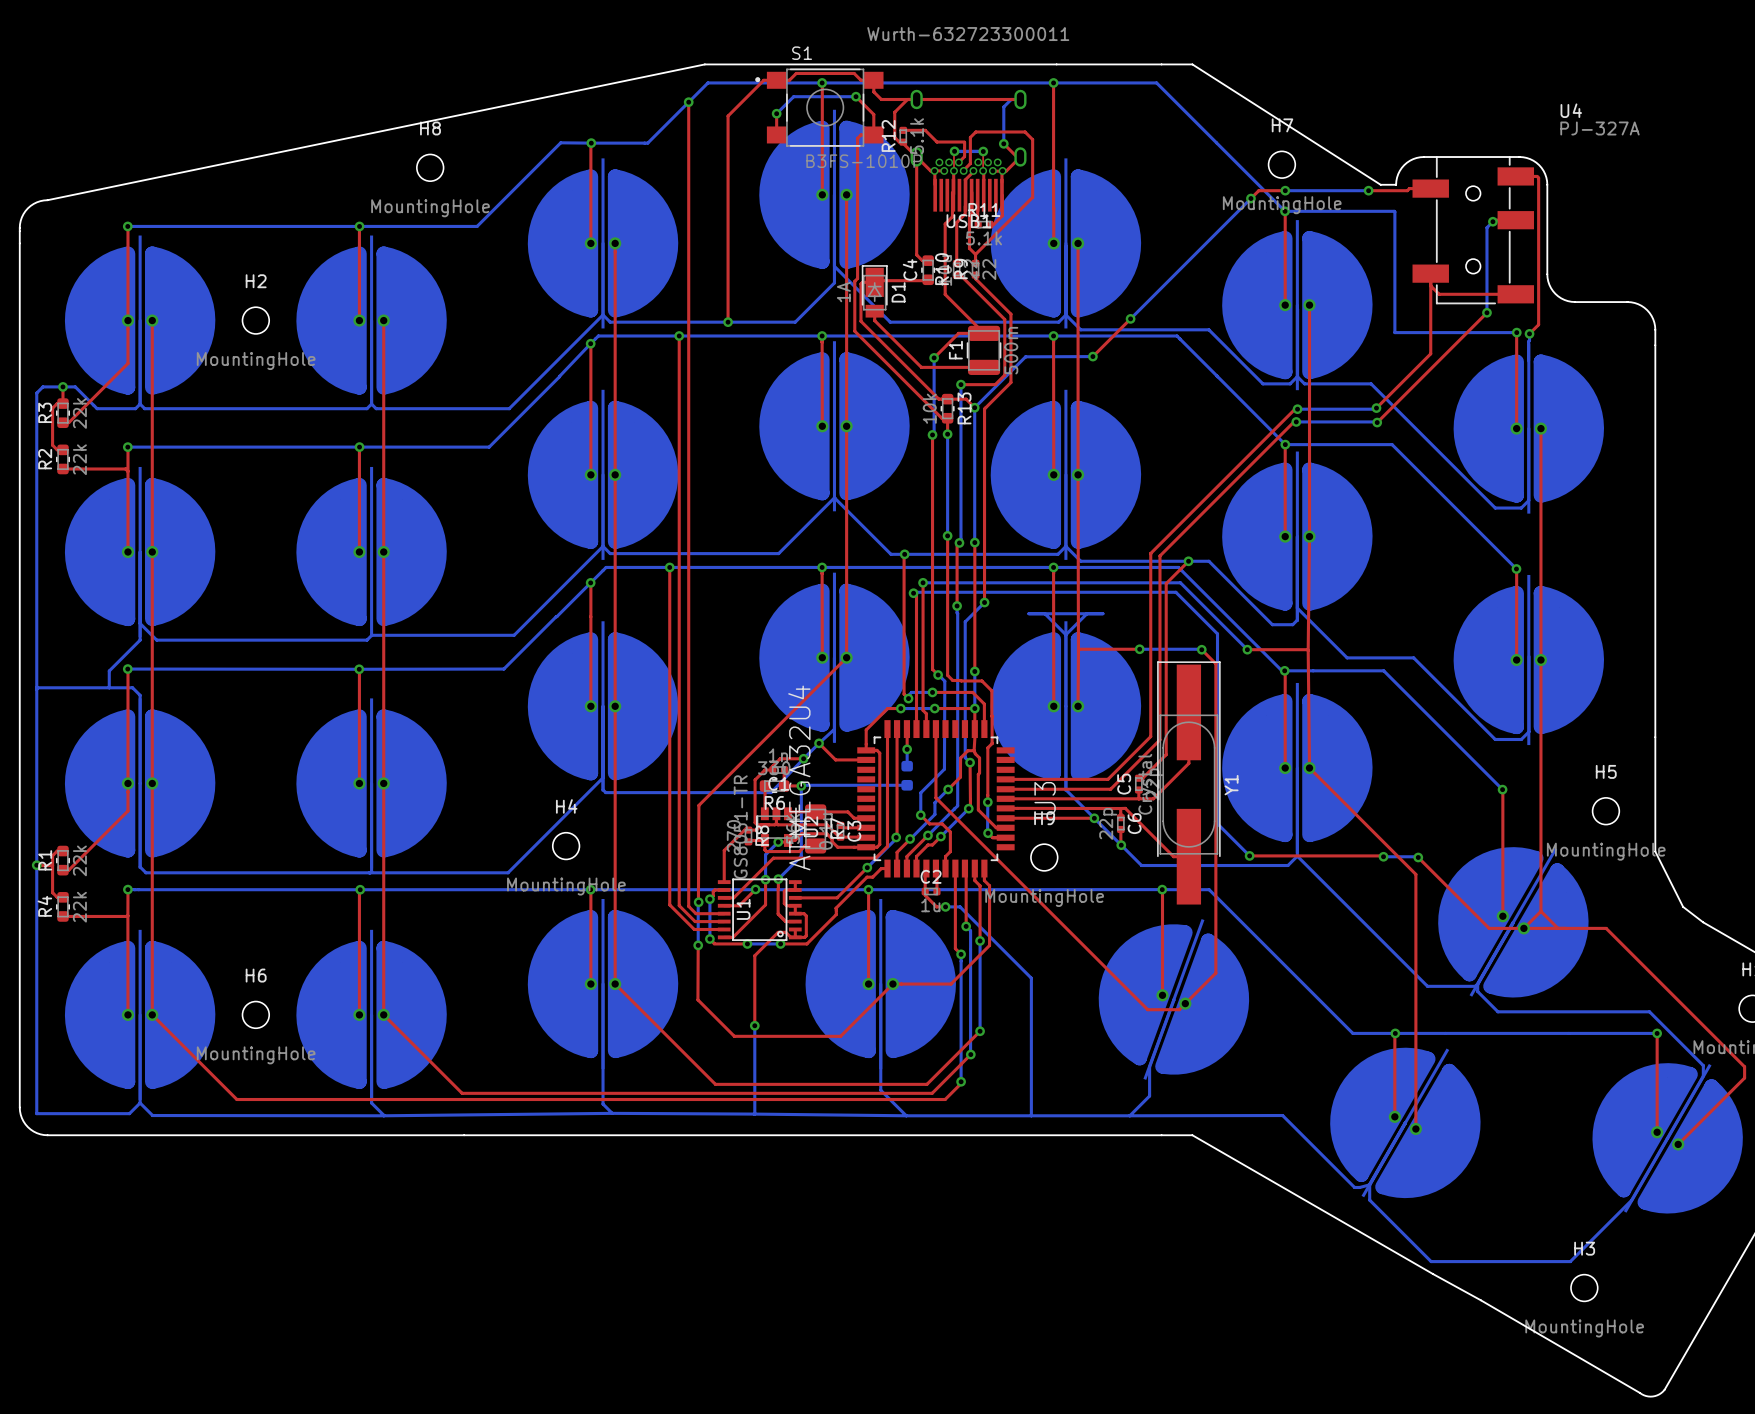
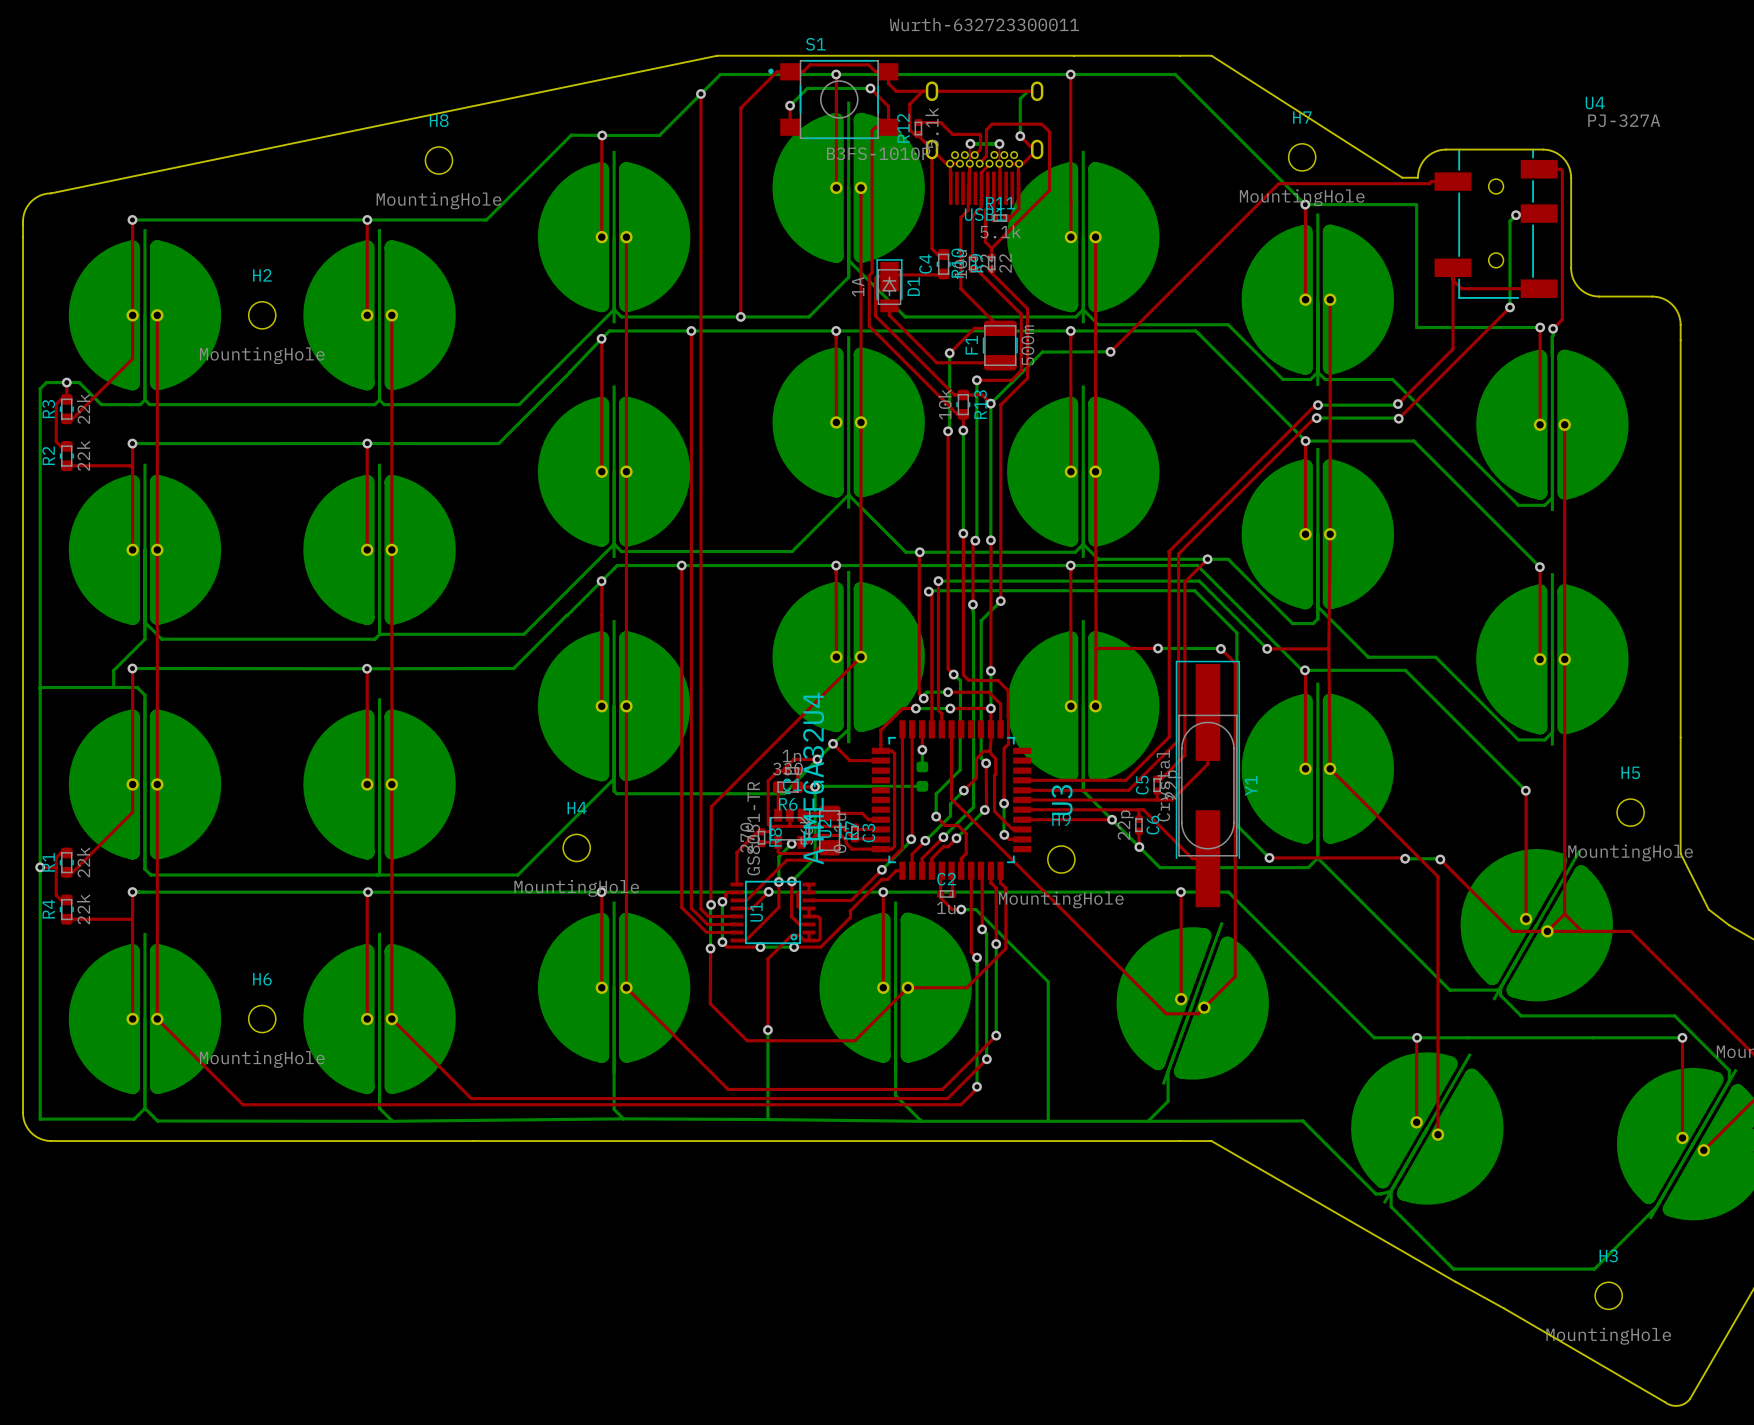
top track: none -> (1305, 183) (1390, 183)
bottom track: (1285, 190) (1368, 190) -> none
via: (1285, 190) -> none
via: (1368, 190) -> none
top track: none -> (1270, 191) (1148, 313)
bottom track: (1250, 198) (1130, 318) -> none
via: (1250, 198) -> none
via: (1130, 318) -> none
bottom track: (1028, 613) (1102, 613) -> none
bottom track: (1044, 613) (1065, 635) -> none
bottom track: (1086, 613) (1065, 634) (1065, 706) -> none

